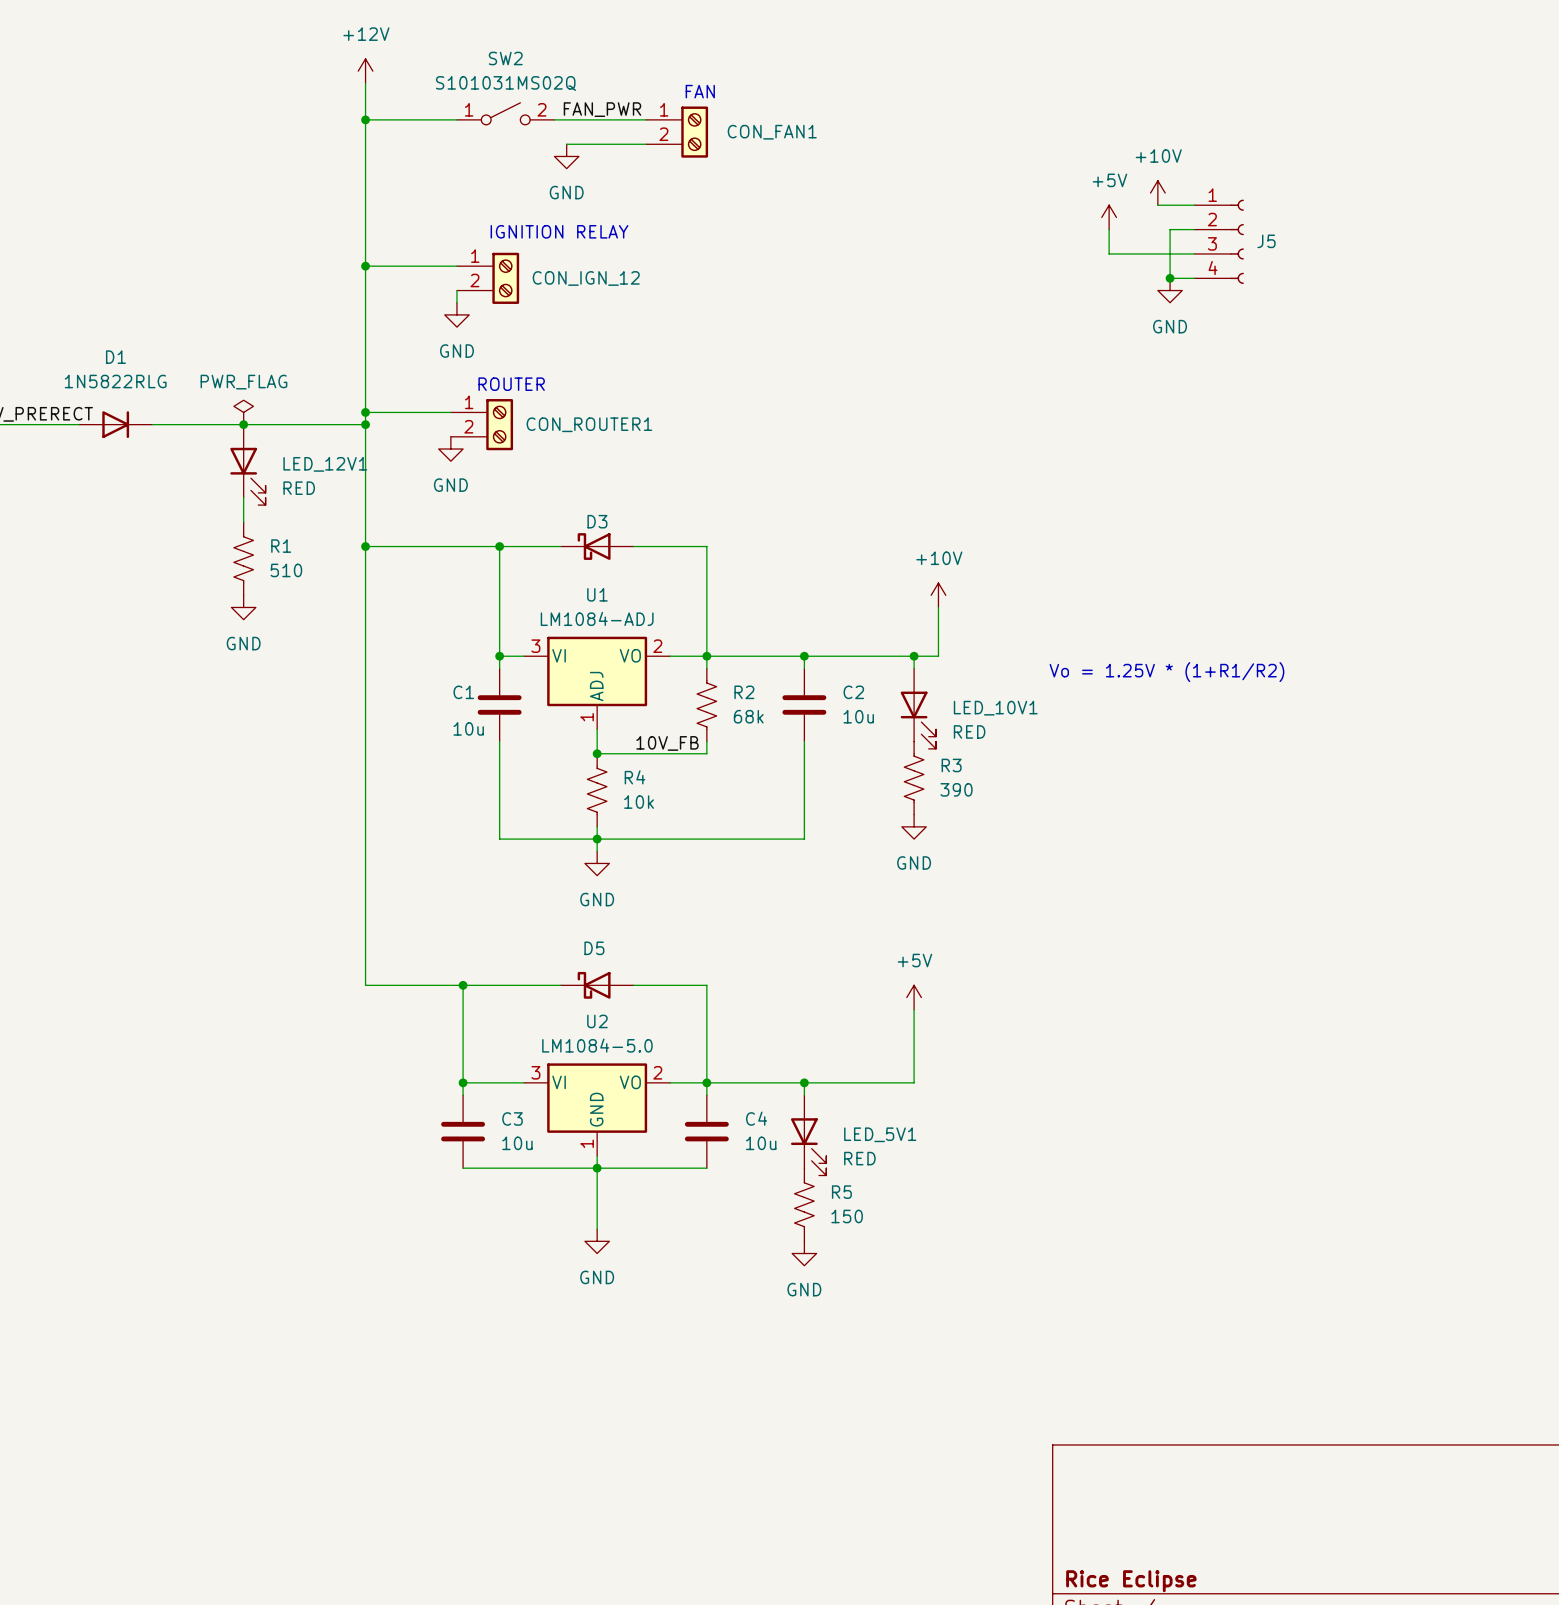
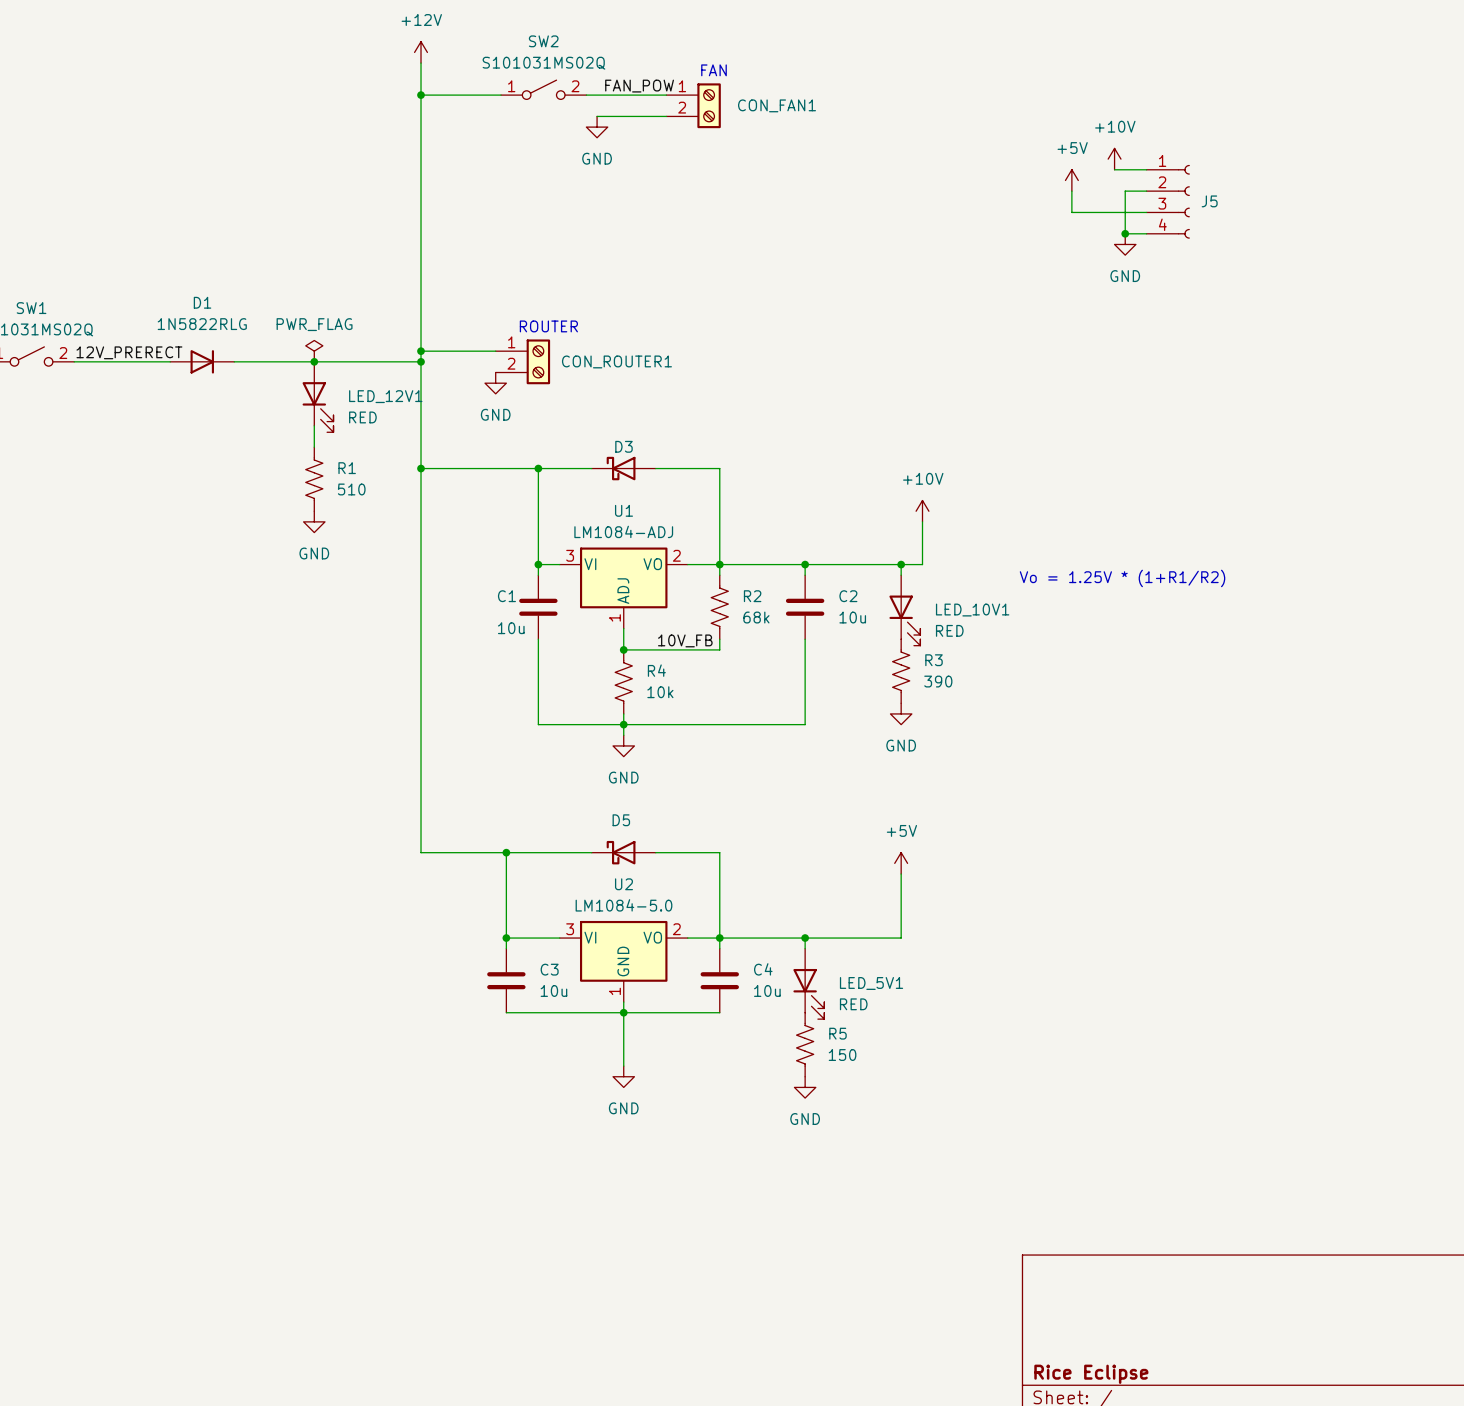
label: FAN_PWR (602, 109) -> FAN_POW (639, 86)
text: IGNITION RELAY (559, 231) -> none
wire: (365, 266) (456, 266) -> none
junction: (365, 266) -> none
CON_IGN_12: (488, 278) -> none
wire: (456, 290) (456, 302) -> none
power symbol: GND (456, 314) -> none

